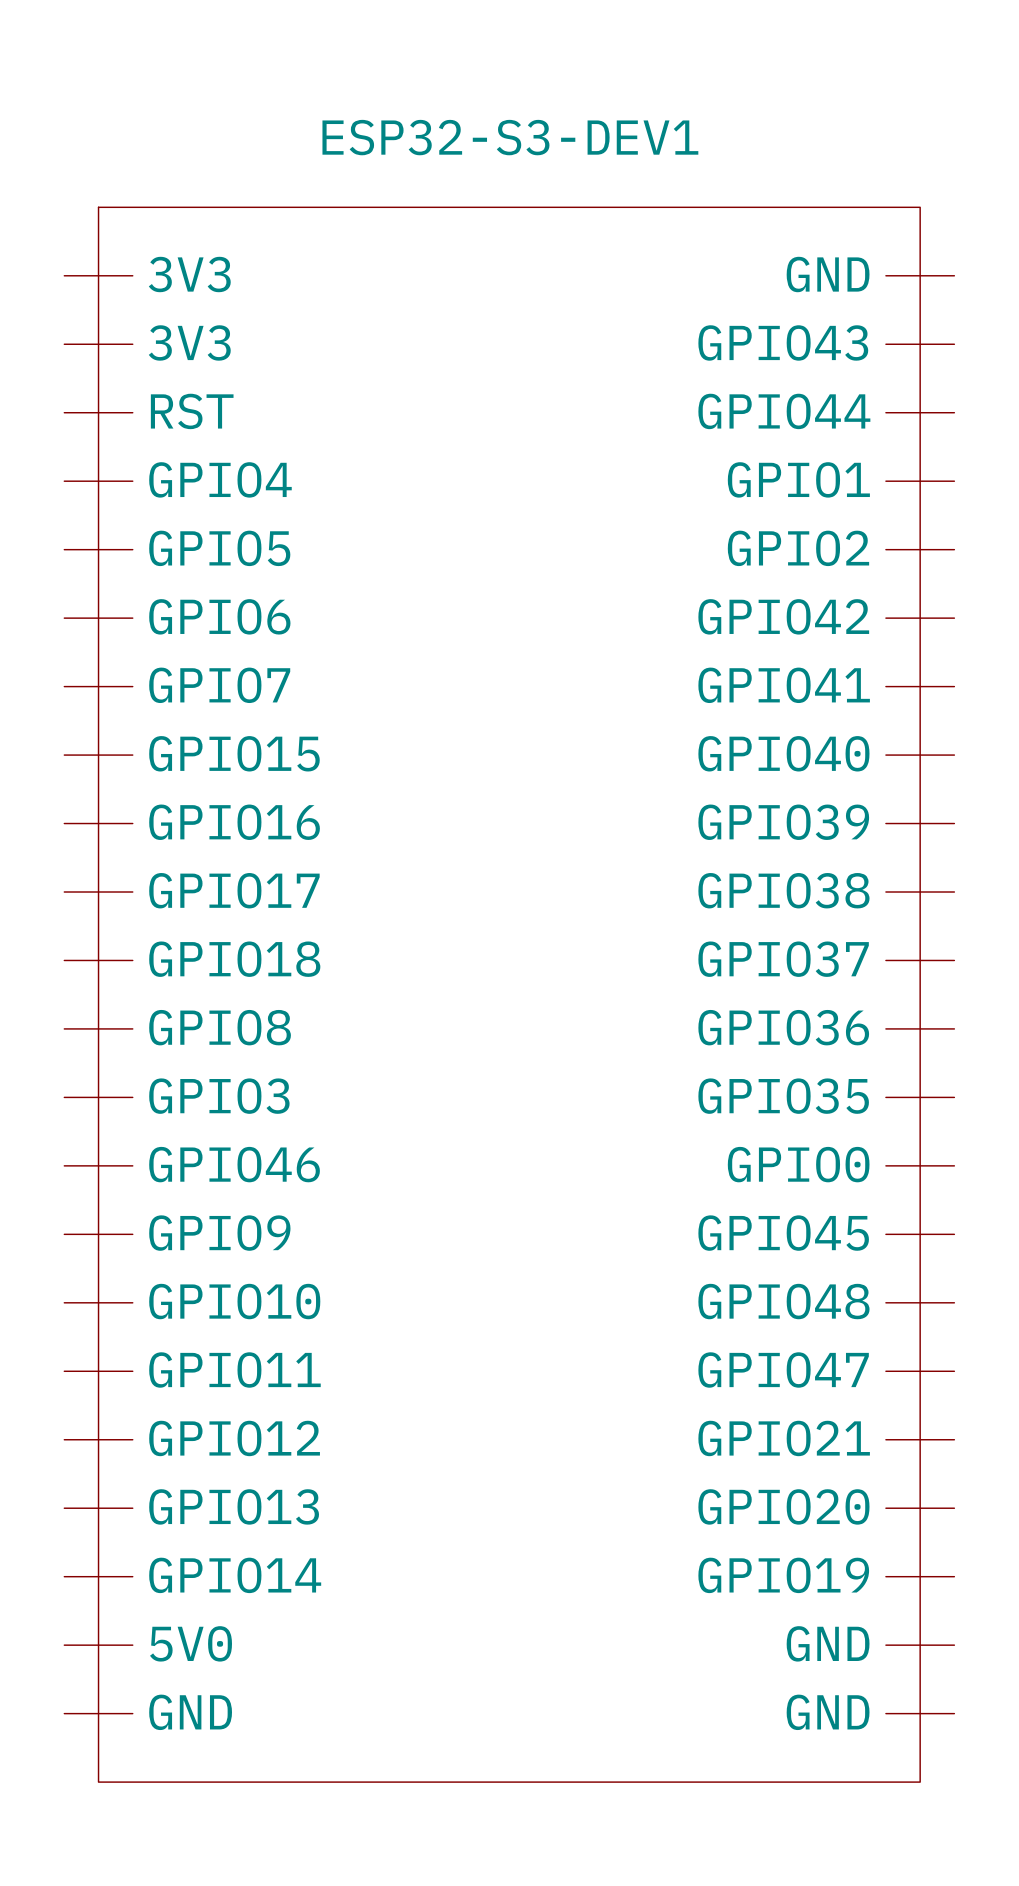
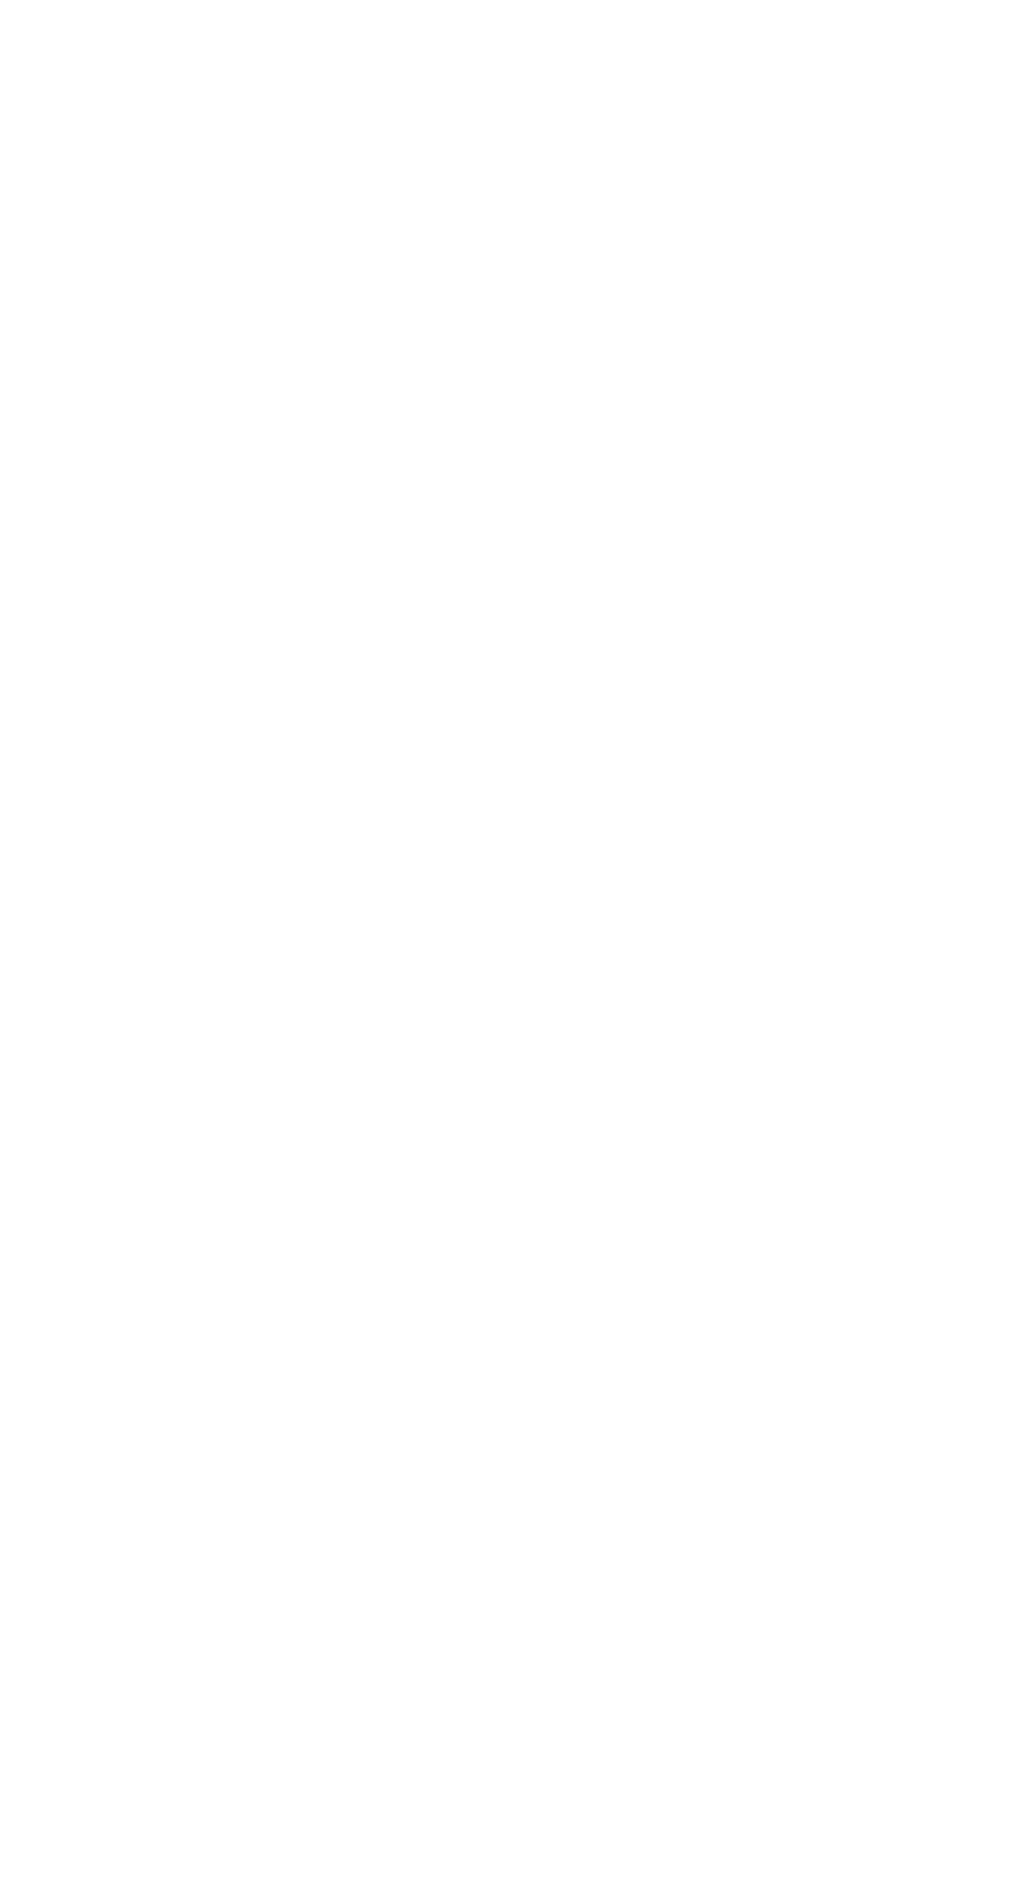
ESP32-S3-DEV1: (509, 994) -> none

